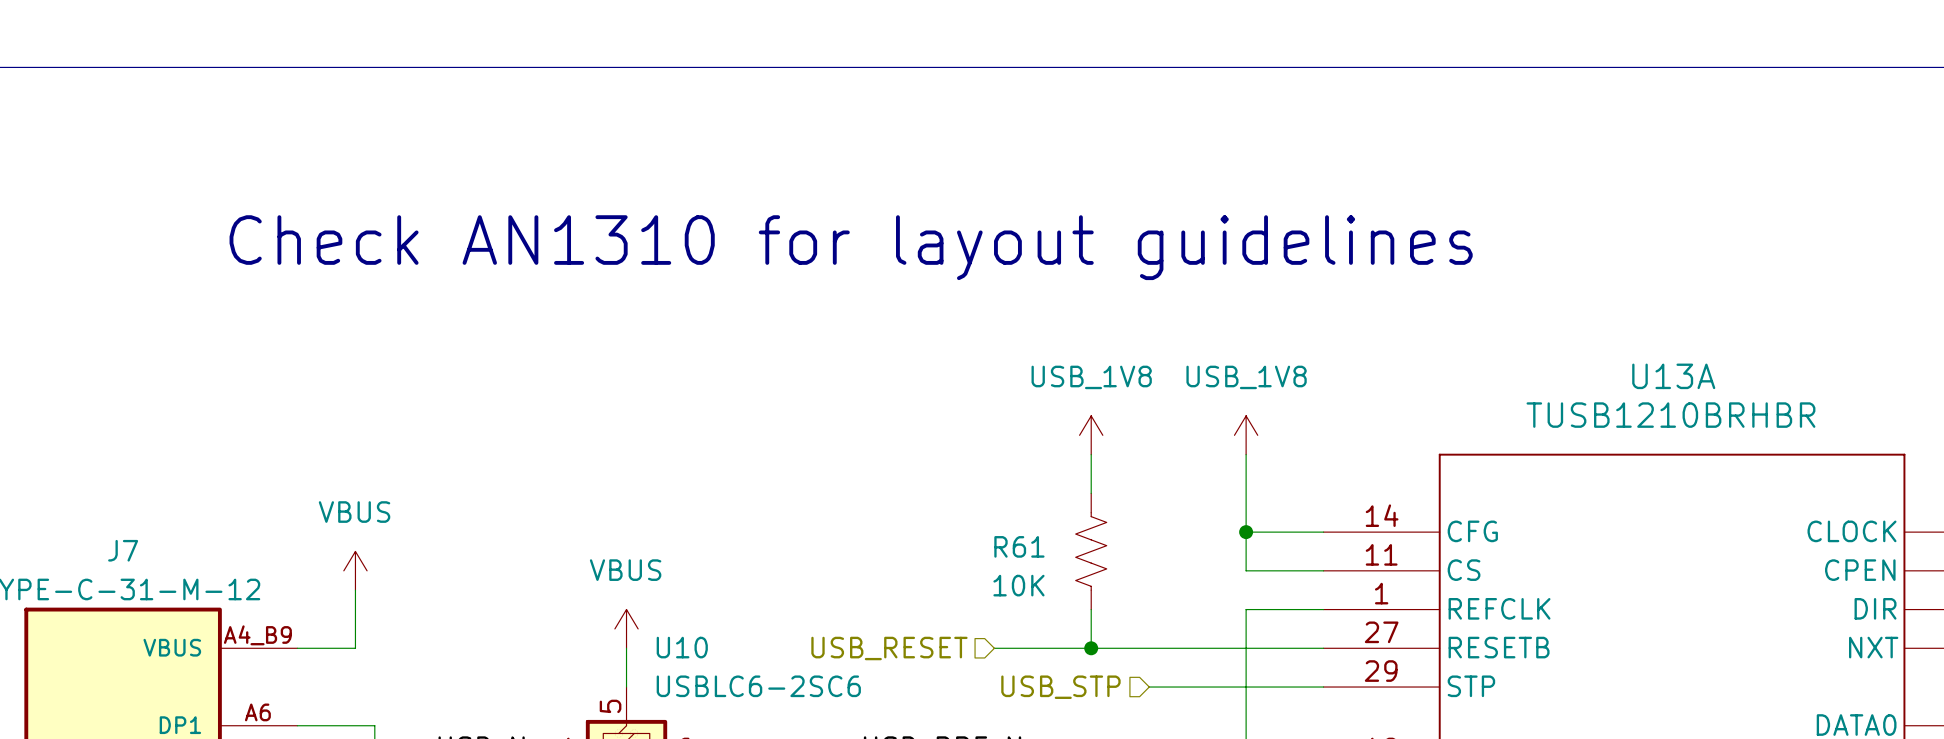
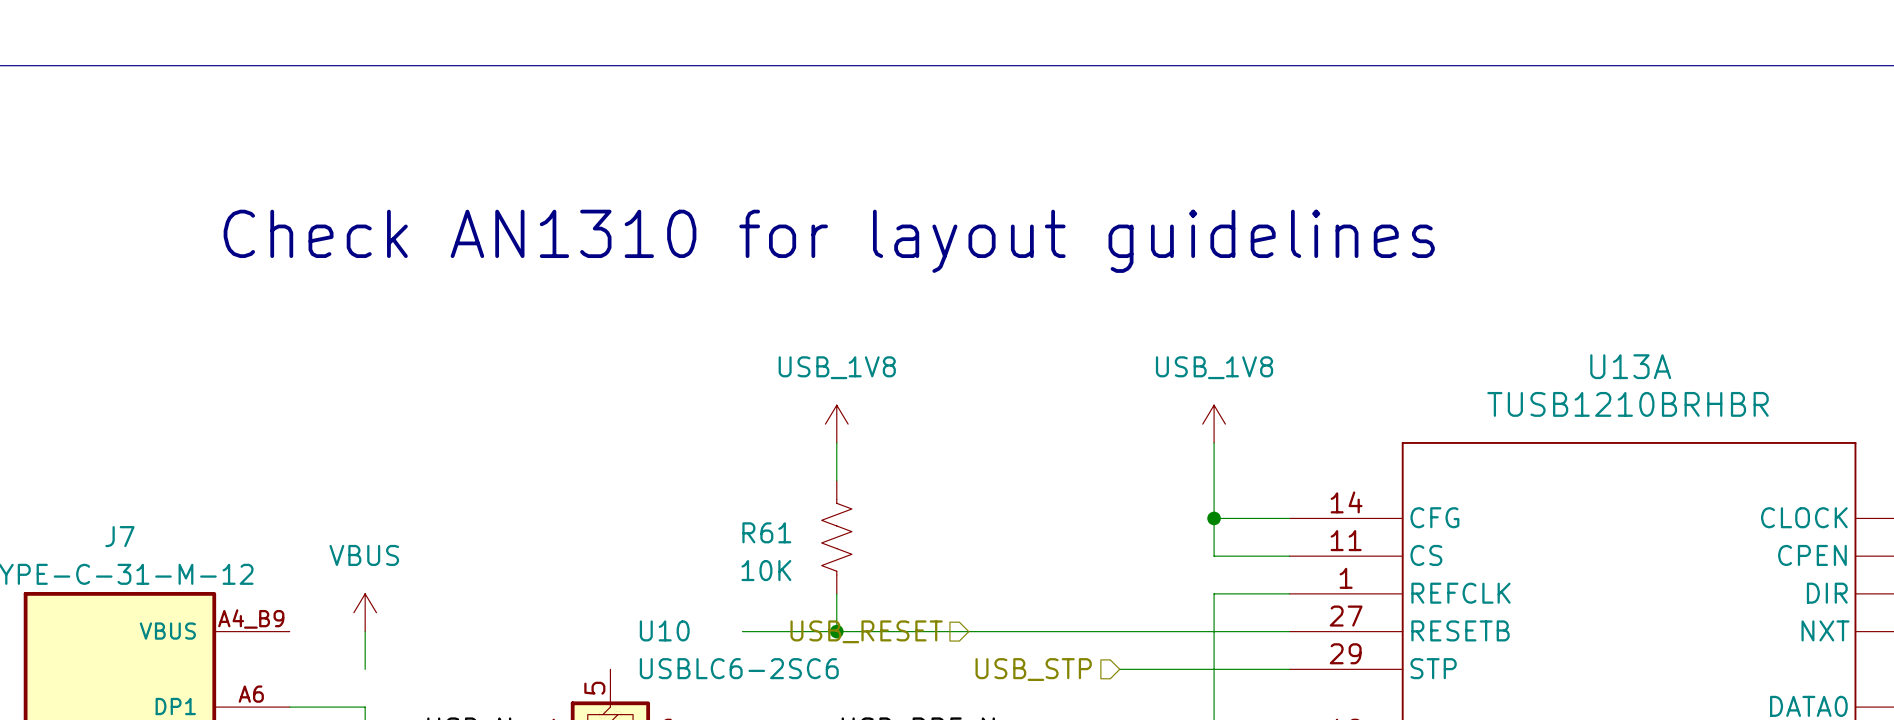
power symbol position: USB_1V8 (1091, 435) -> USB_1V8 (836, 424)
wire: (1091, 454) (1091, 493) -> (836, 442) (836, 480)
R61 position: (1091, 551) -> (836, 537)
power symbol position: VBUS (355, 570) -> VBUS (365, 612)
wire: (355, 590) (355, 648) (297, 648) -> none
wire: (1091, 609) (1091, 648) -> (836, 593) (836, 631)
power symbol: VBUS (626, 628) -> none
wire: (626, 648) (626, 687) -> (365, 631) (365, 669)
wire: none -> (742, 631) (968, 631)
junction: none -> (836, 631)
junction: (1091, 648) -> none

